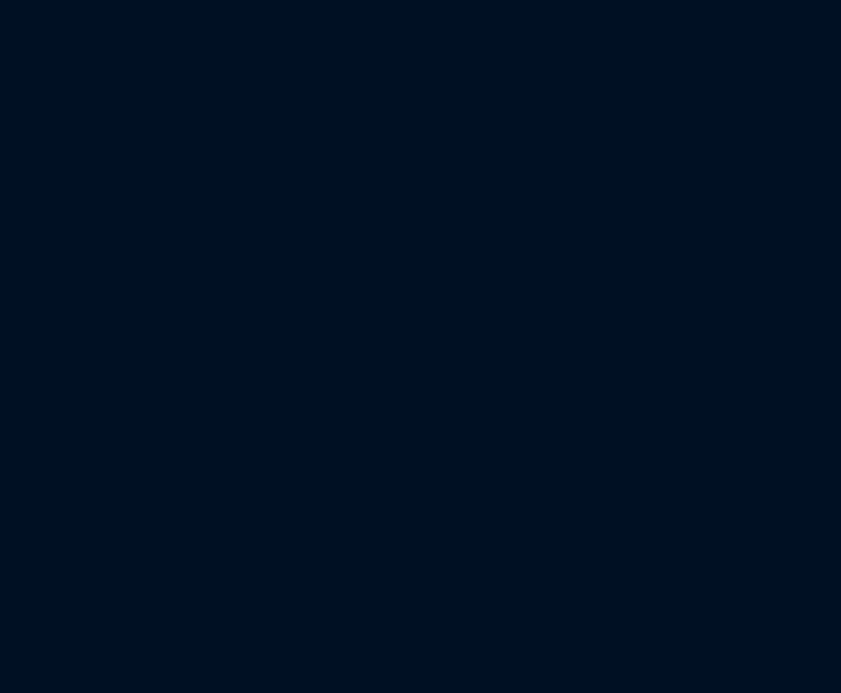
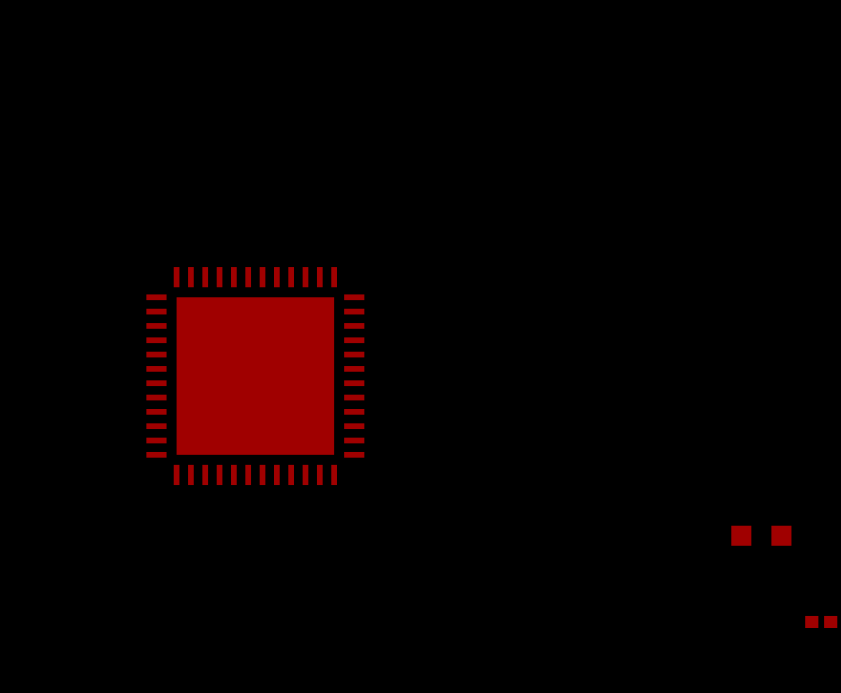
part: none -> (255, 376)
part: none -> (761, 535)
part: none -> (821, 621)

